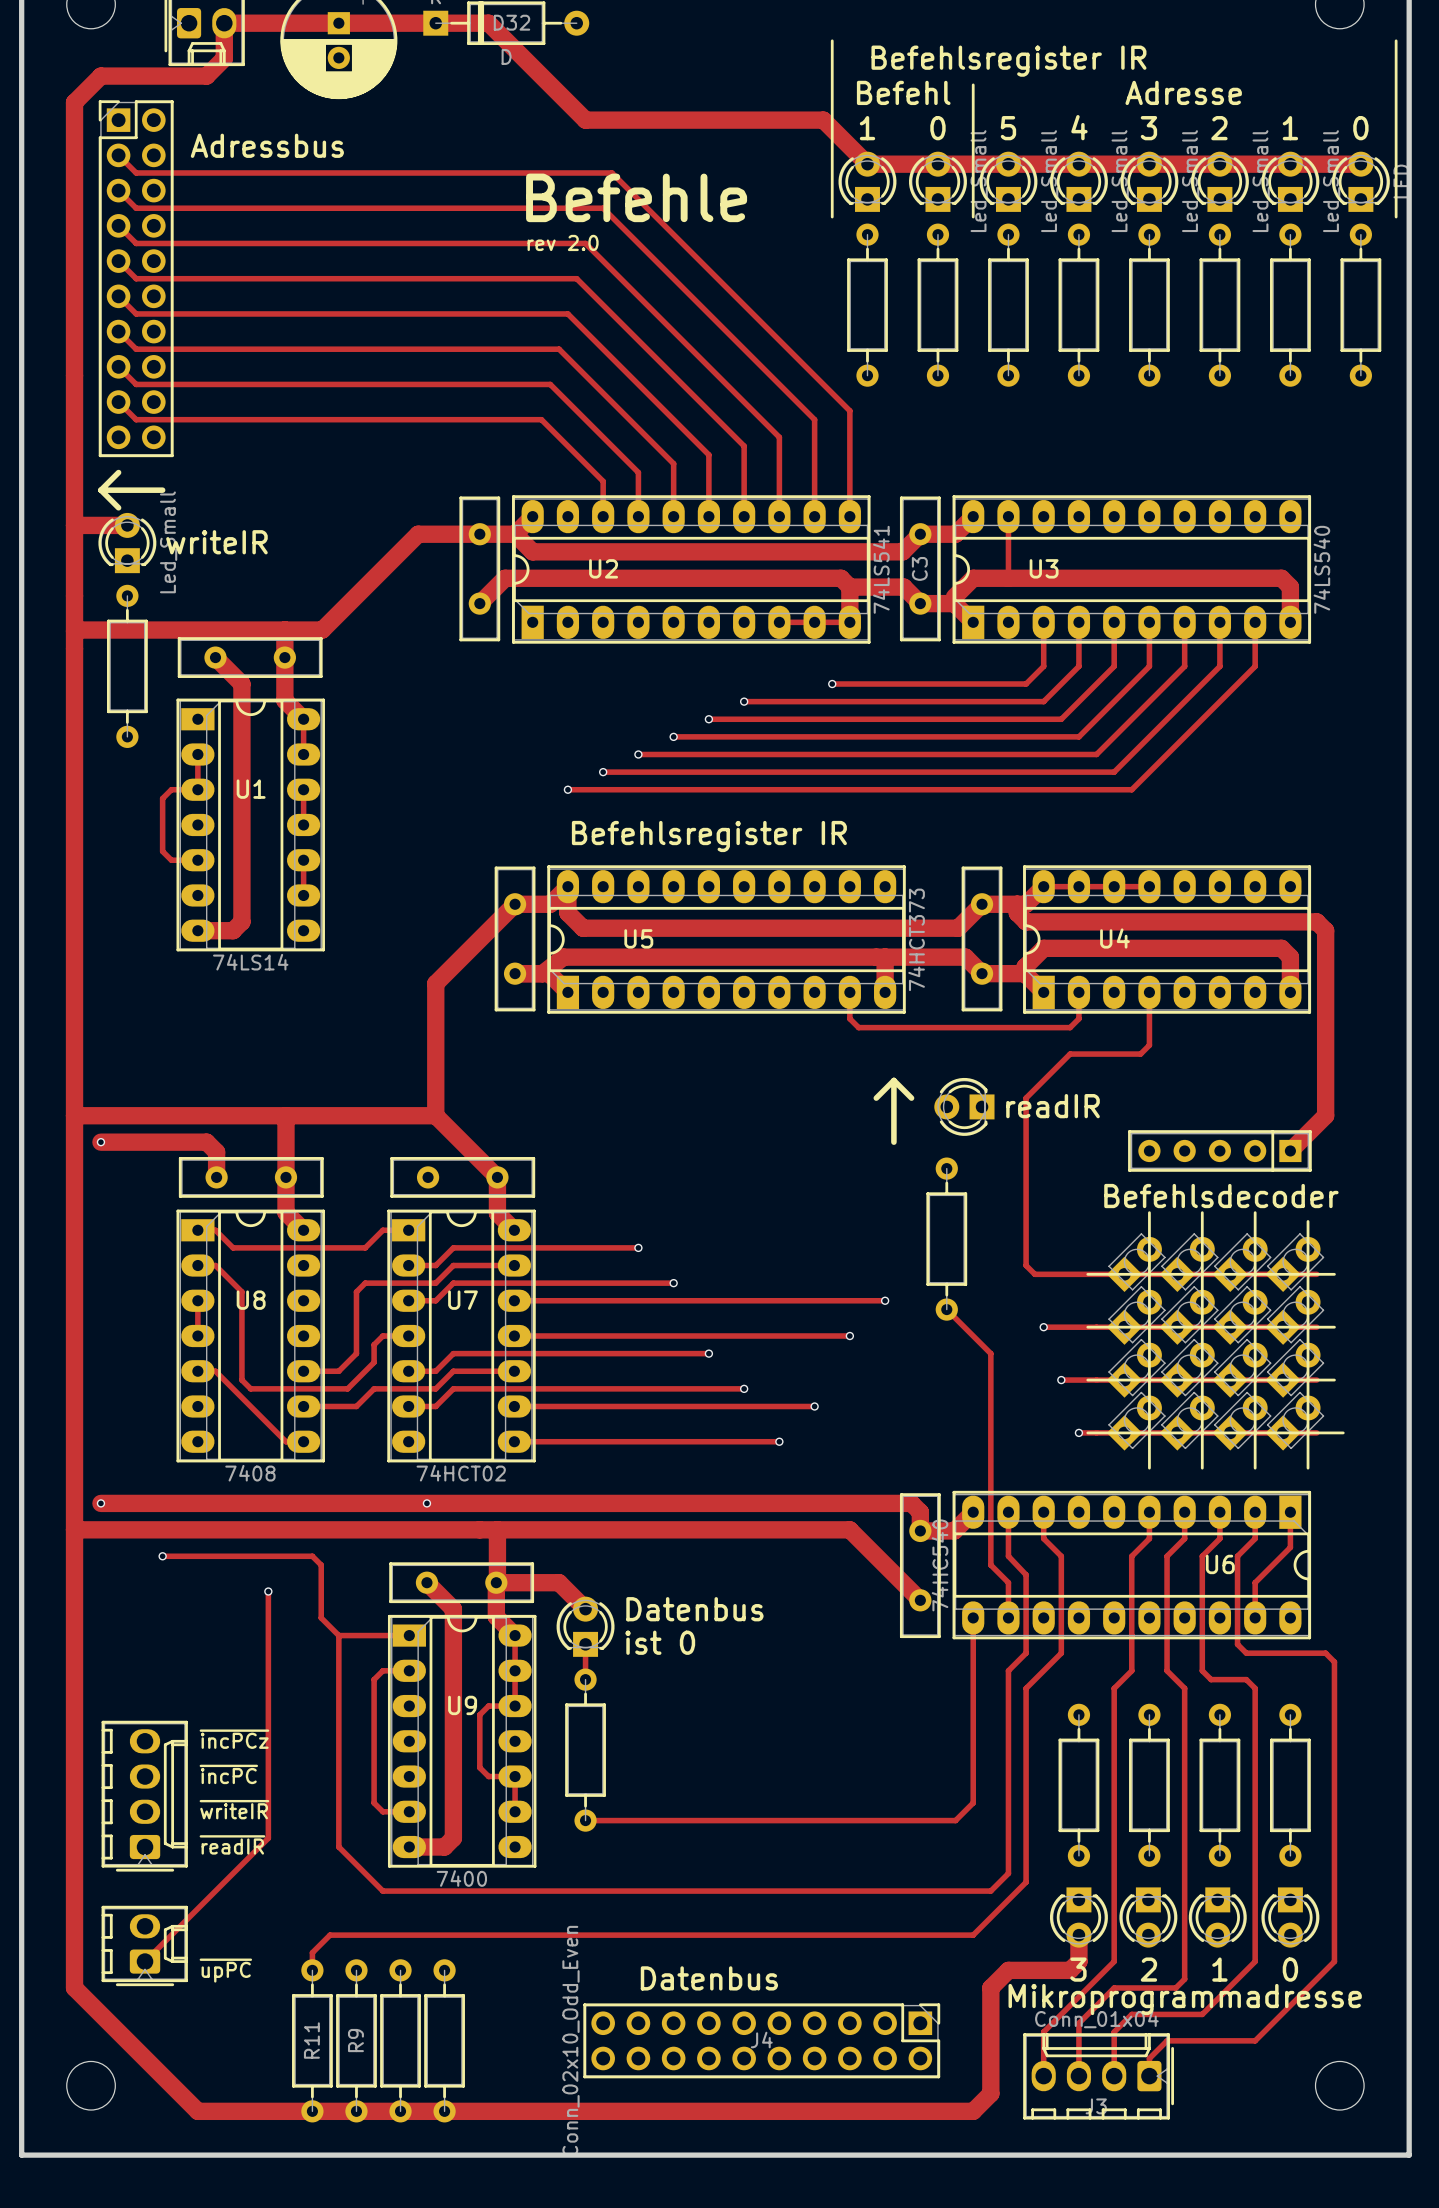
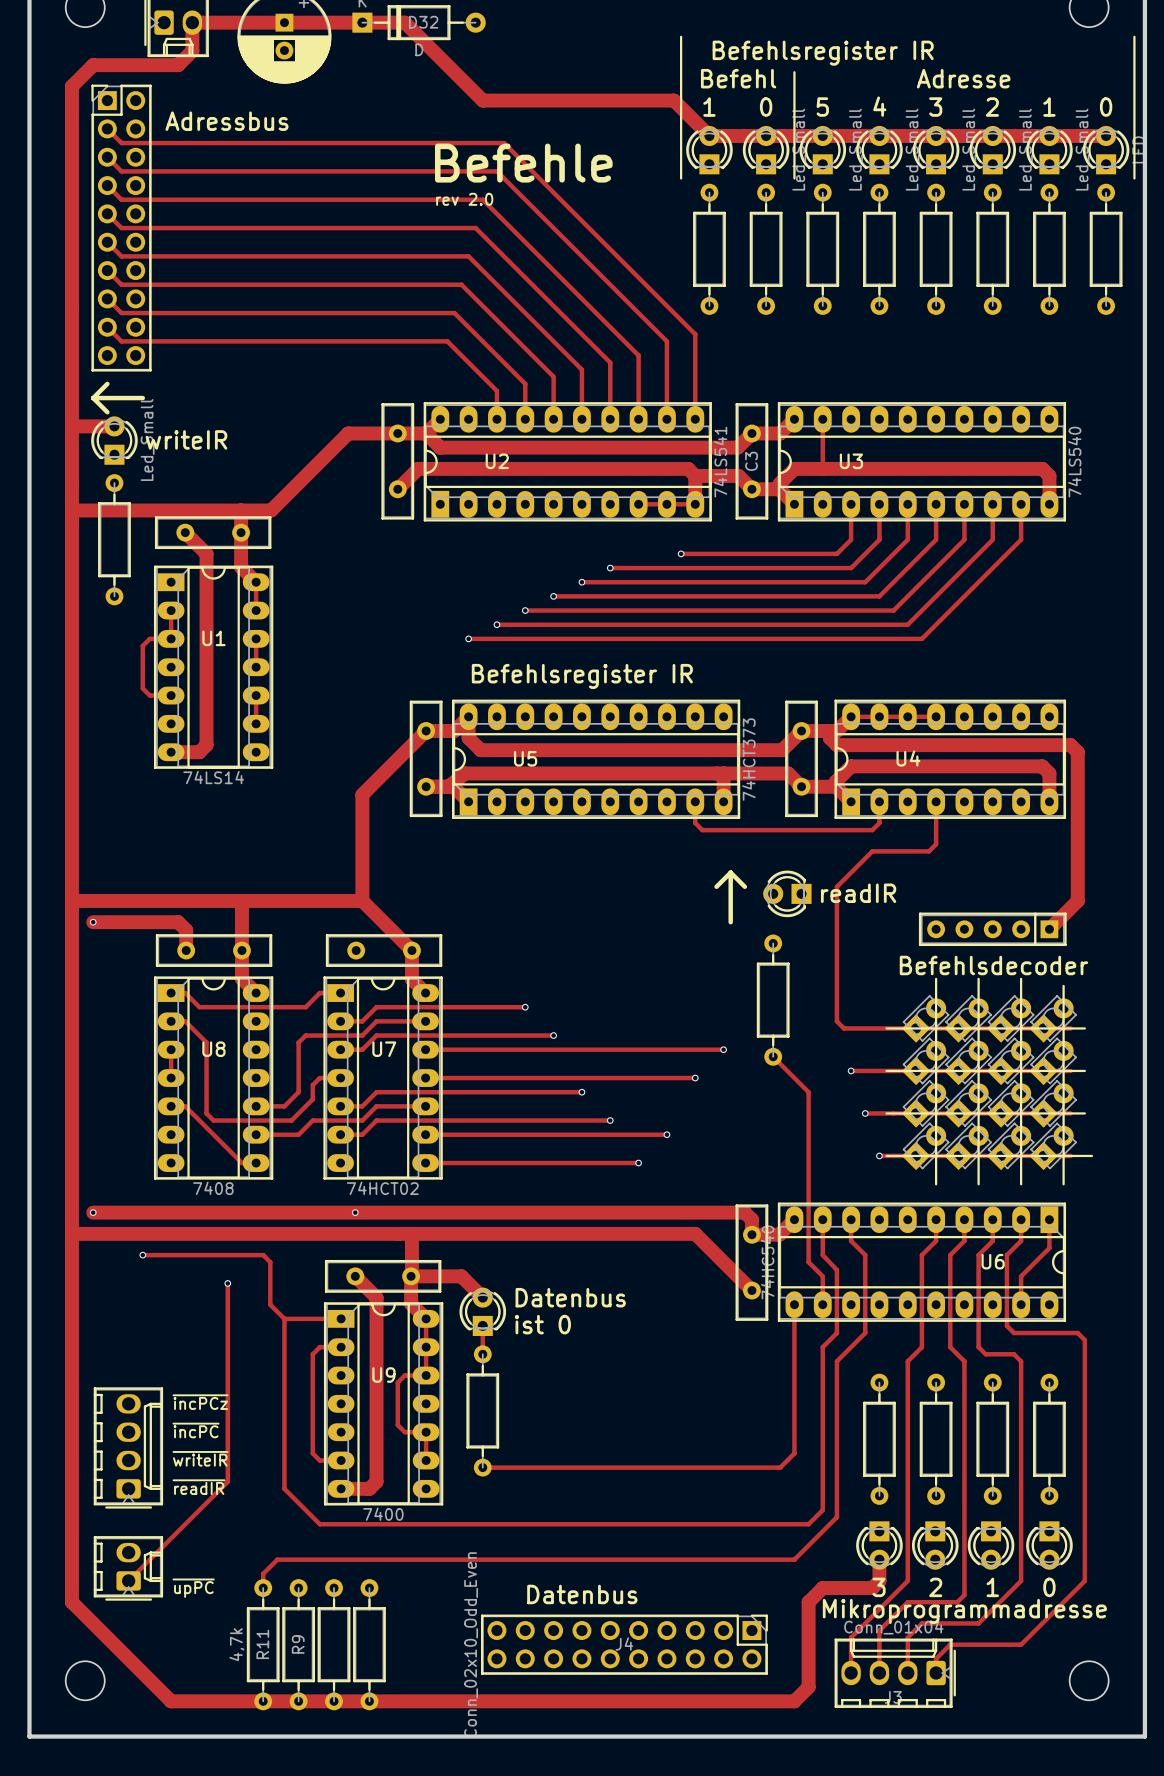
R11 value: none -> 4,7k (236, 1644)

